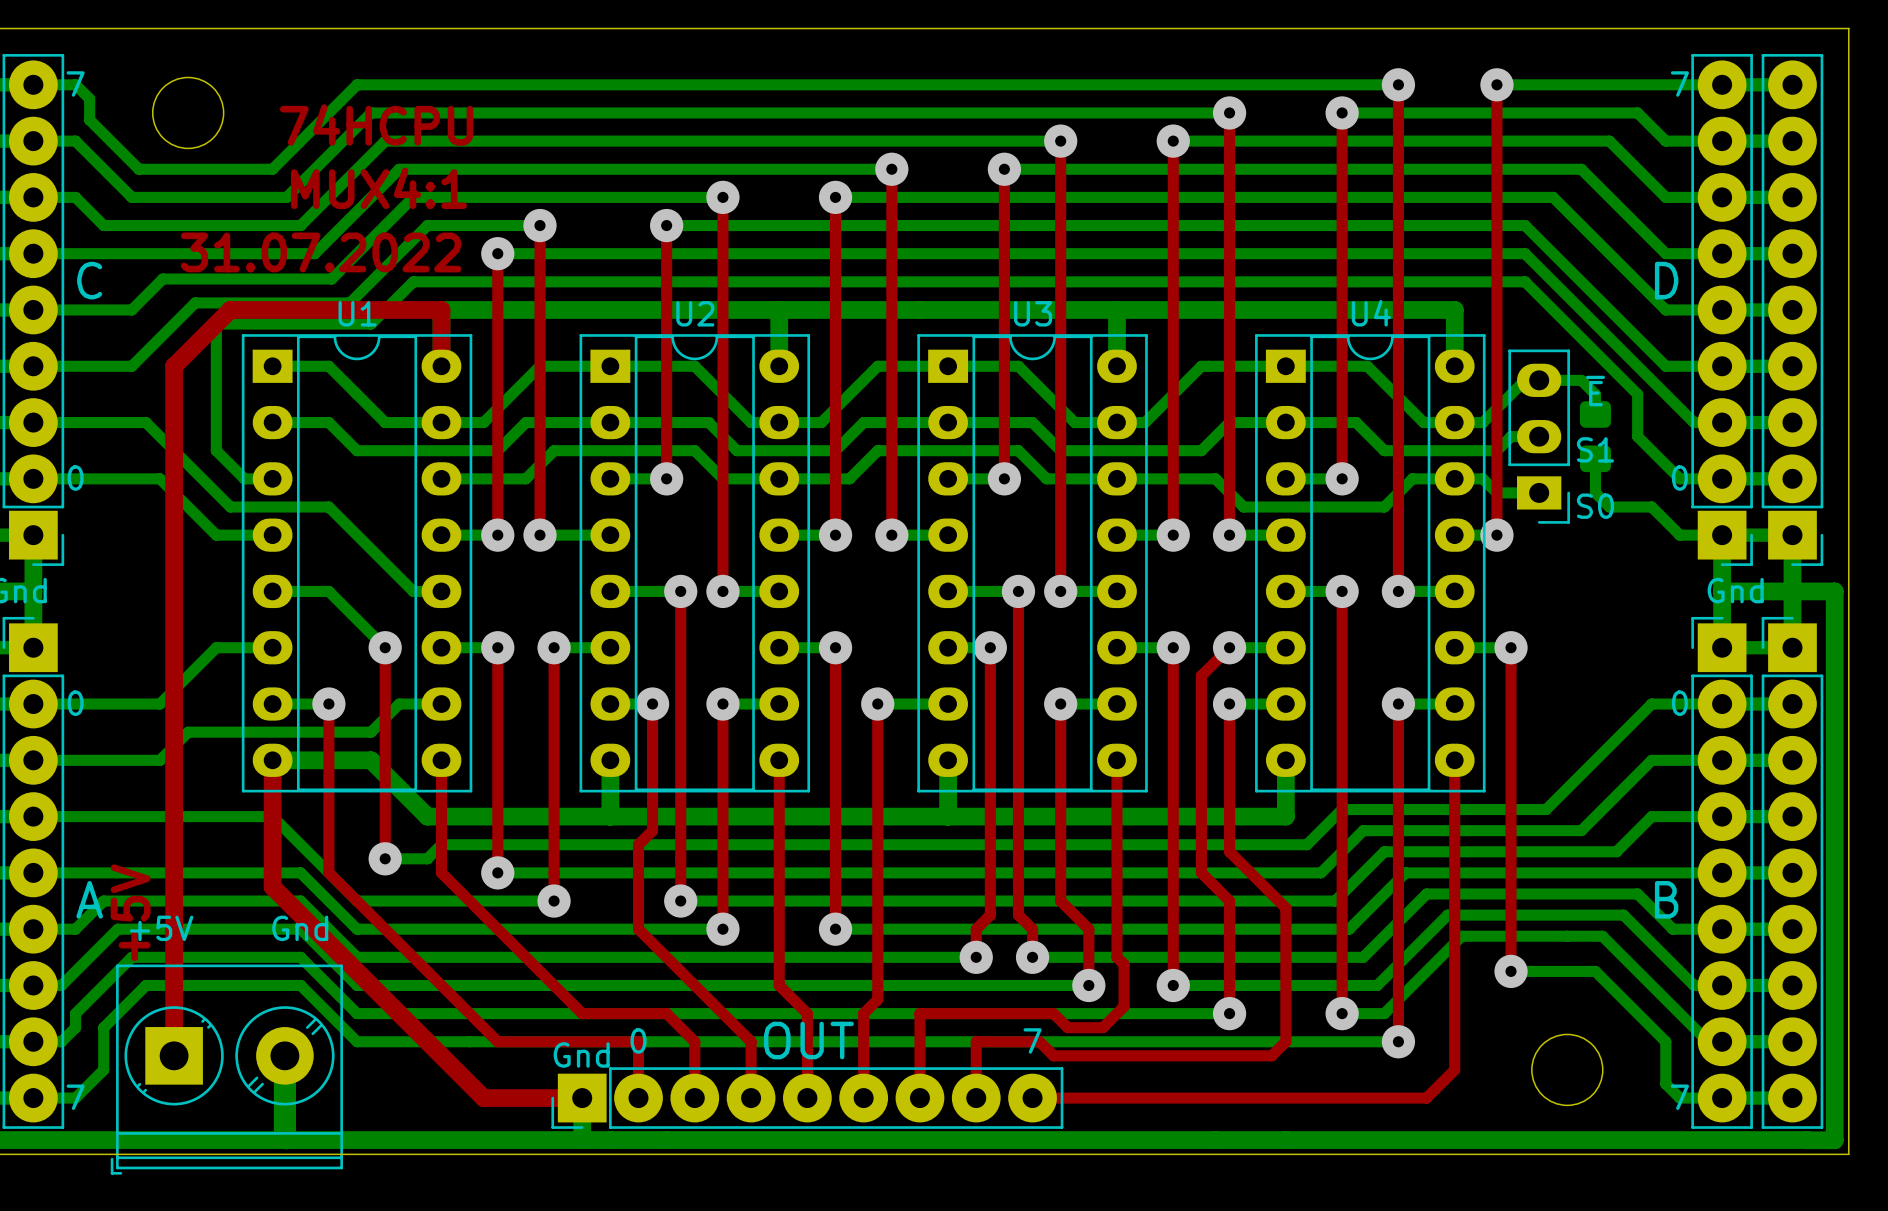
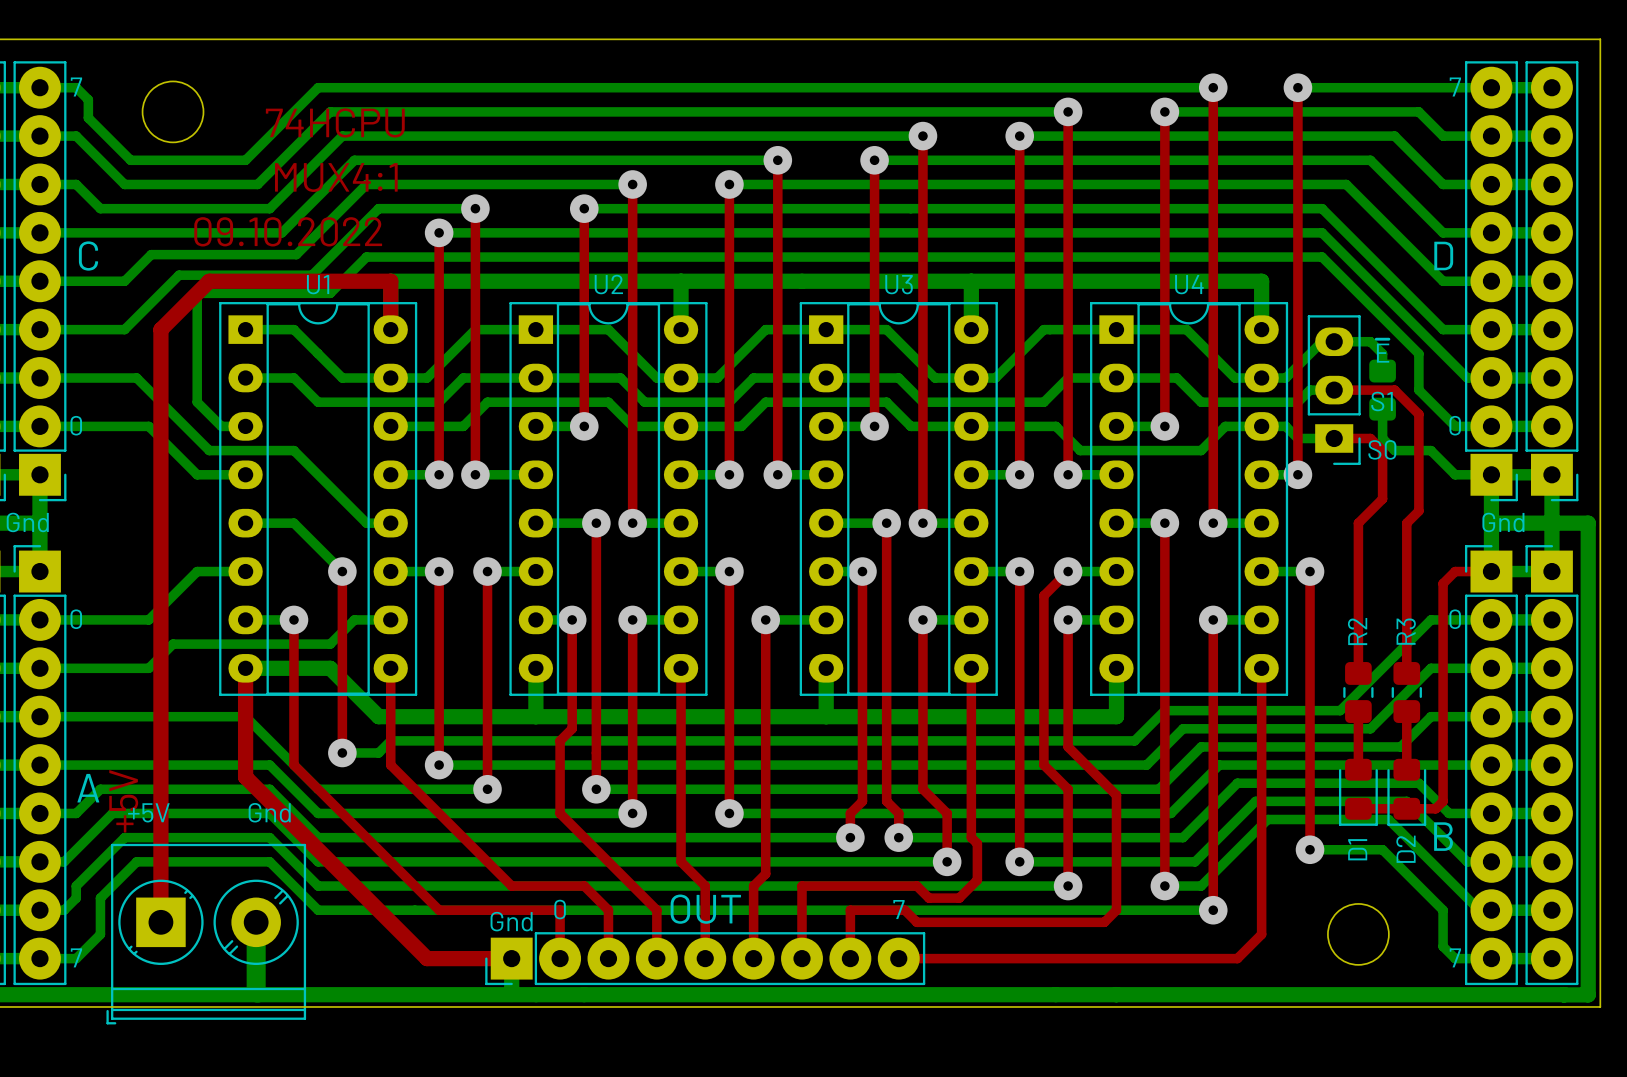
text: 31.07.2022 (321, 252) -> 09.10.2022 (288, 231)
top track: none -> (1334, 390) (1394, 390) (1418, 414) (1418, 511) (1406, 523) (1406, 673)
top track: none -> (1334, 438) (1370, 438) (1382, 450) (1382, 498) (1358, 523) (1358, 673)
top track: none -> (1491, 571) (1455, 571) (1443, 583) (1443, 801) (1435, 808) (1358, 808)
R2: none -> (1358, 692)
R3: none -> (1406, 692)
top track: none -> (1358, 711) (1358, 769)
top track: none -> (1406, 711) (1406, 769)
text position: B (1666, 899) -> B (1443, 836)
D1: none -> (1358, 792)
D2: none -> (1406, 792)

